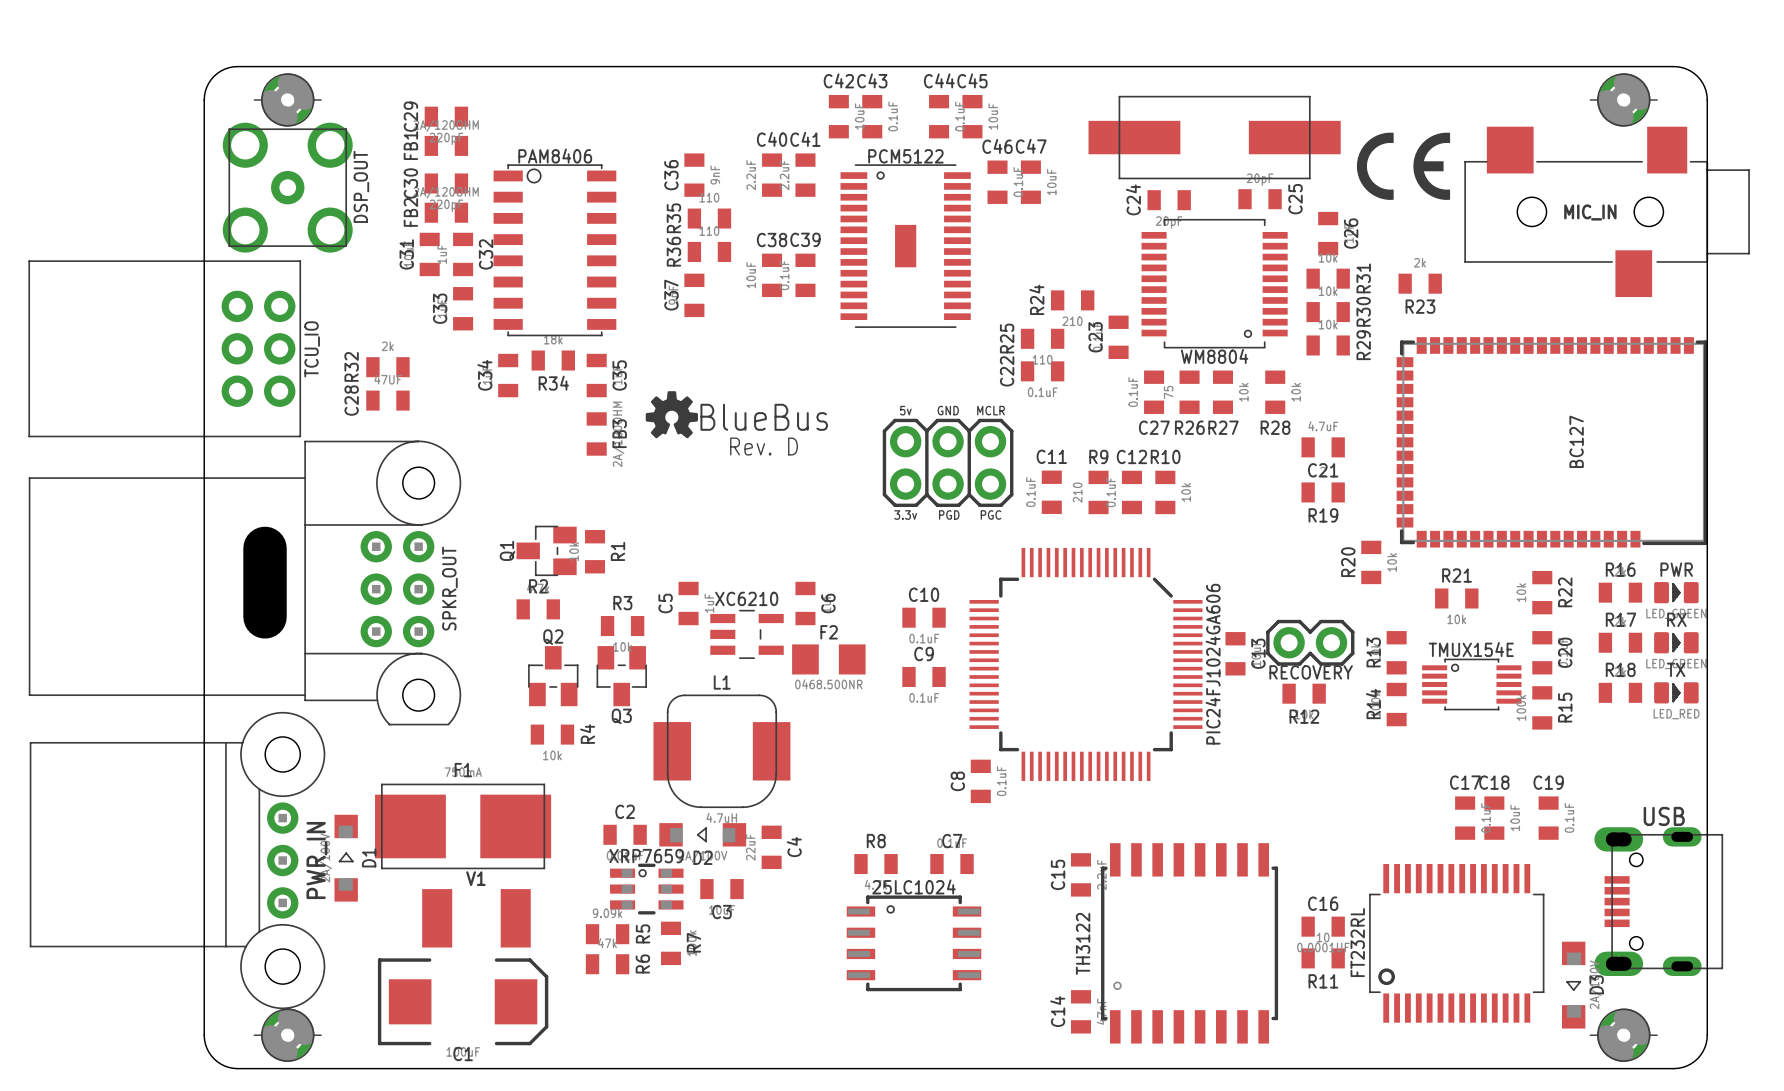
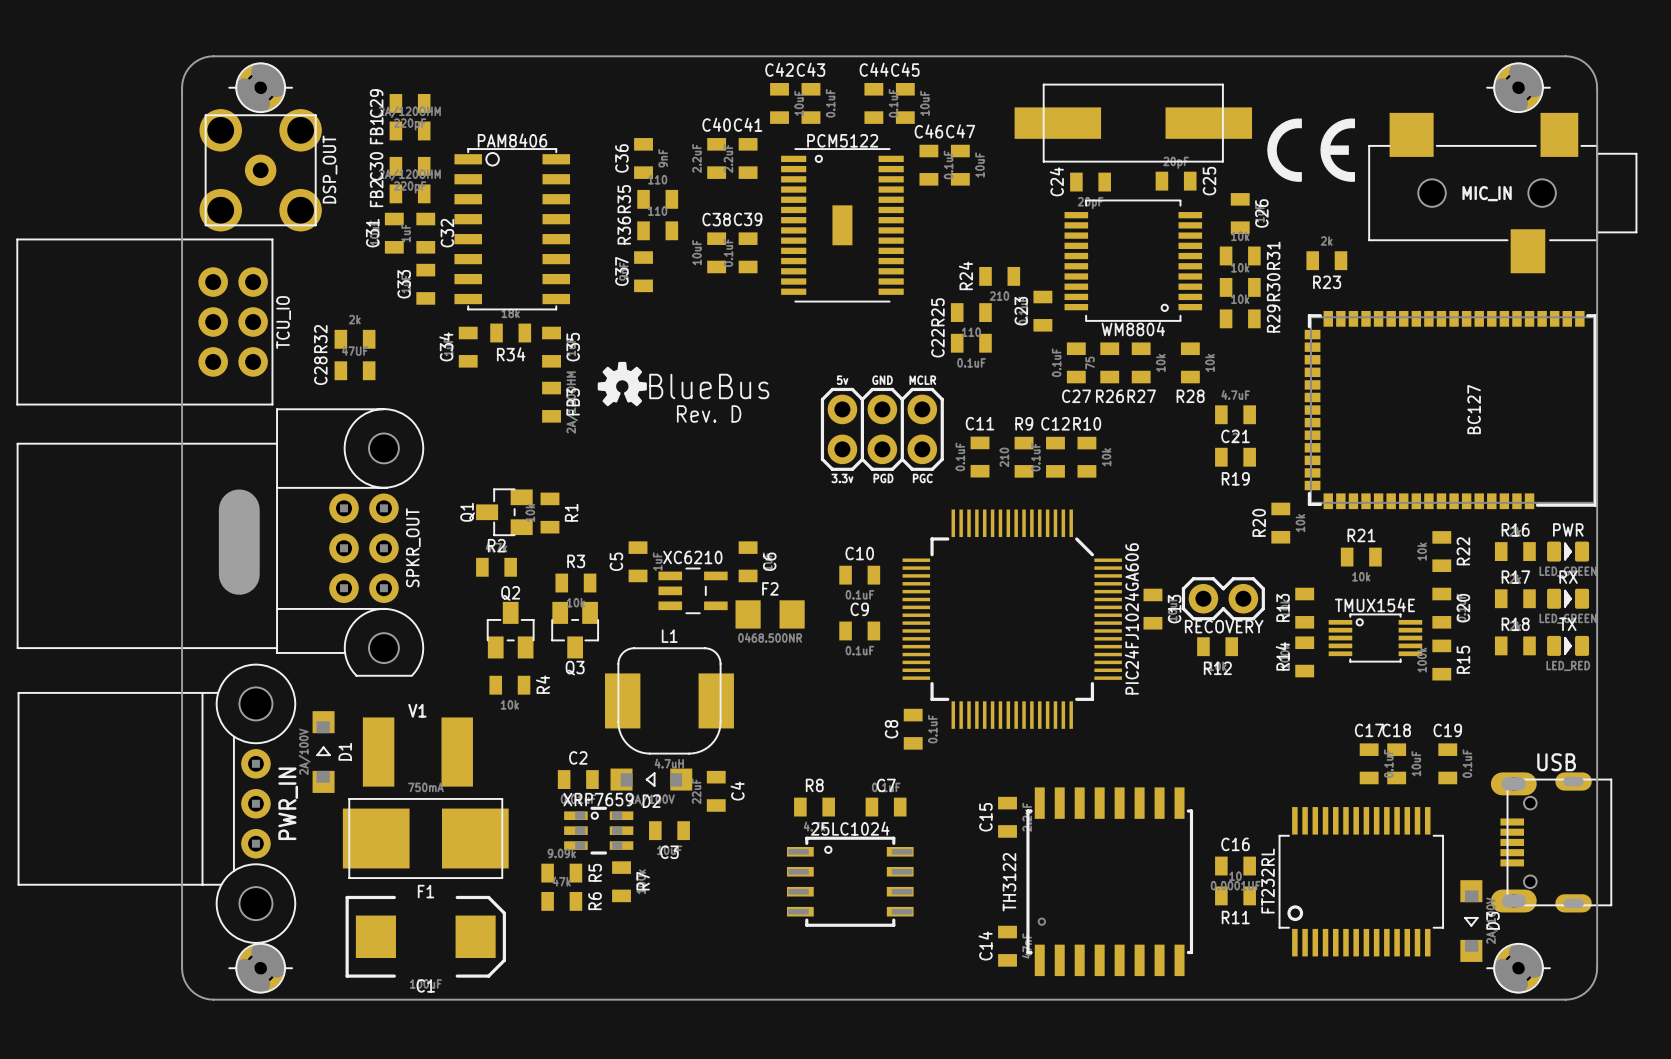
F1 name position: F1 (463, 770) -> F1 (426, 891)
F1 position: (463, 826) -> (425, 838)
D1 position: (346, 858) -> (323, 752)
V1 footprint: [422, 889, 531, 948] -> [362, 717, 473, 787]

